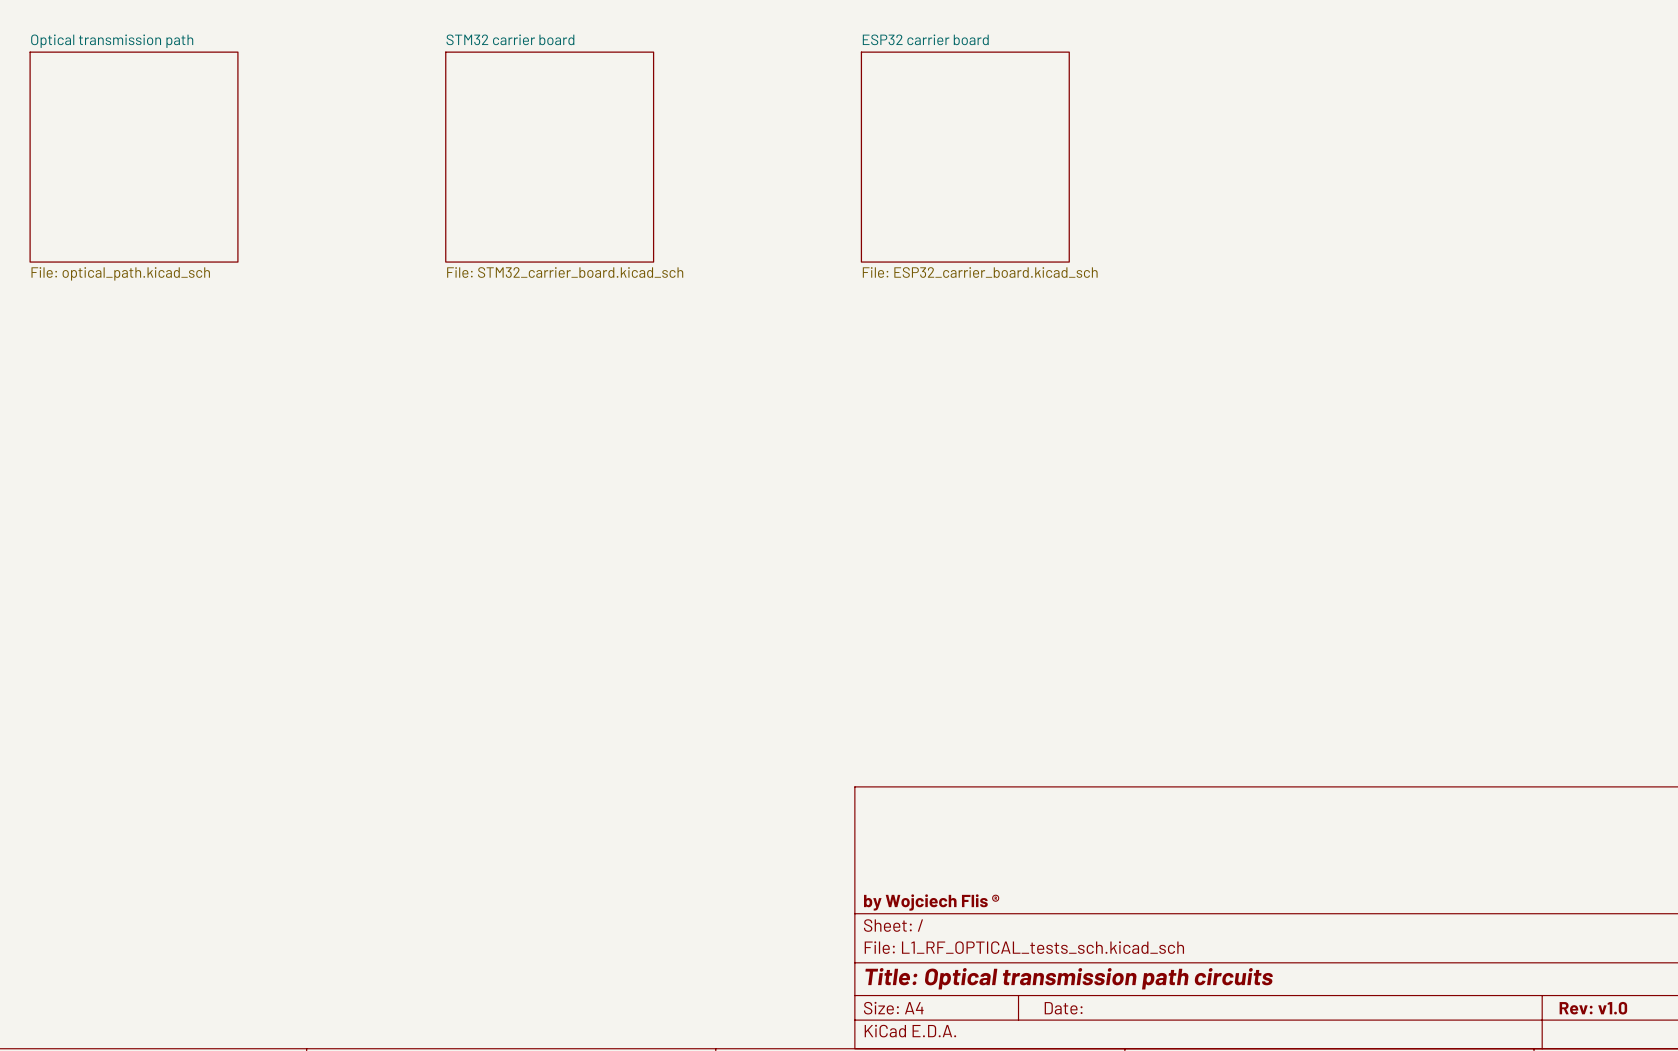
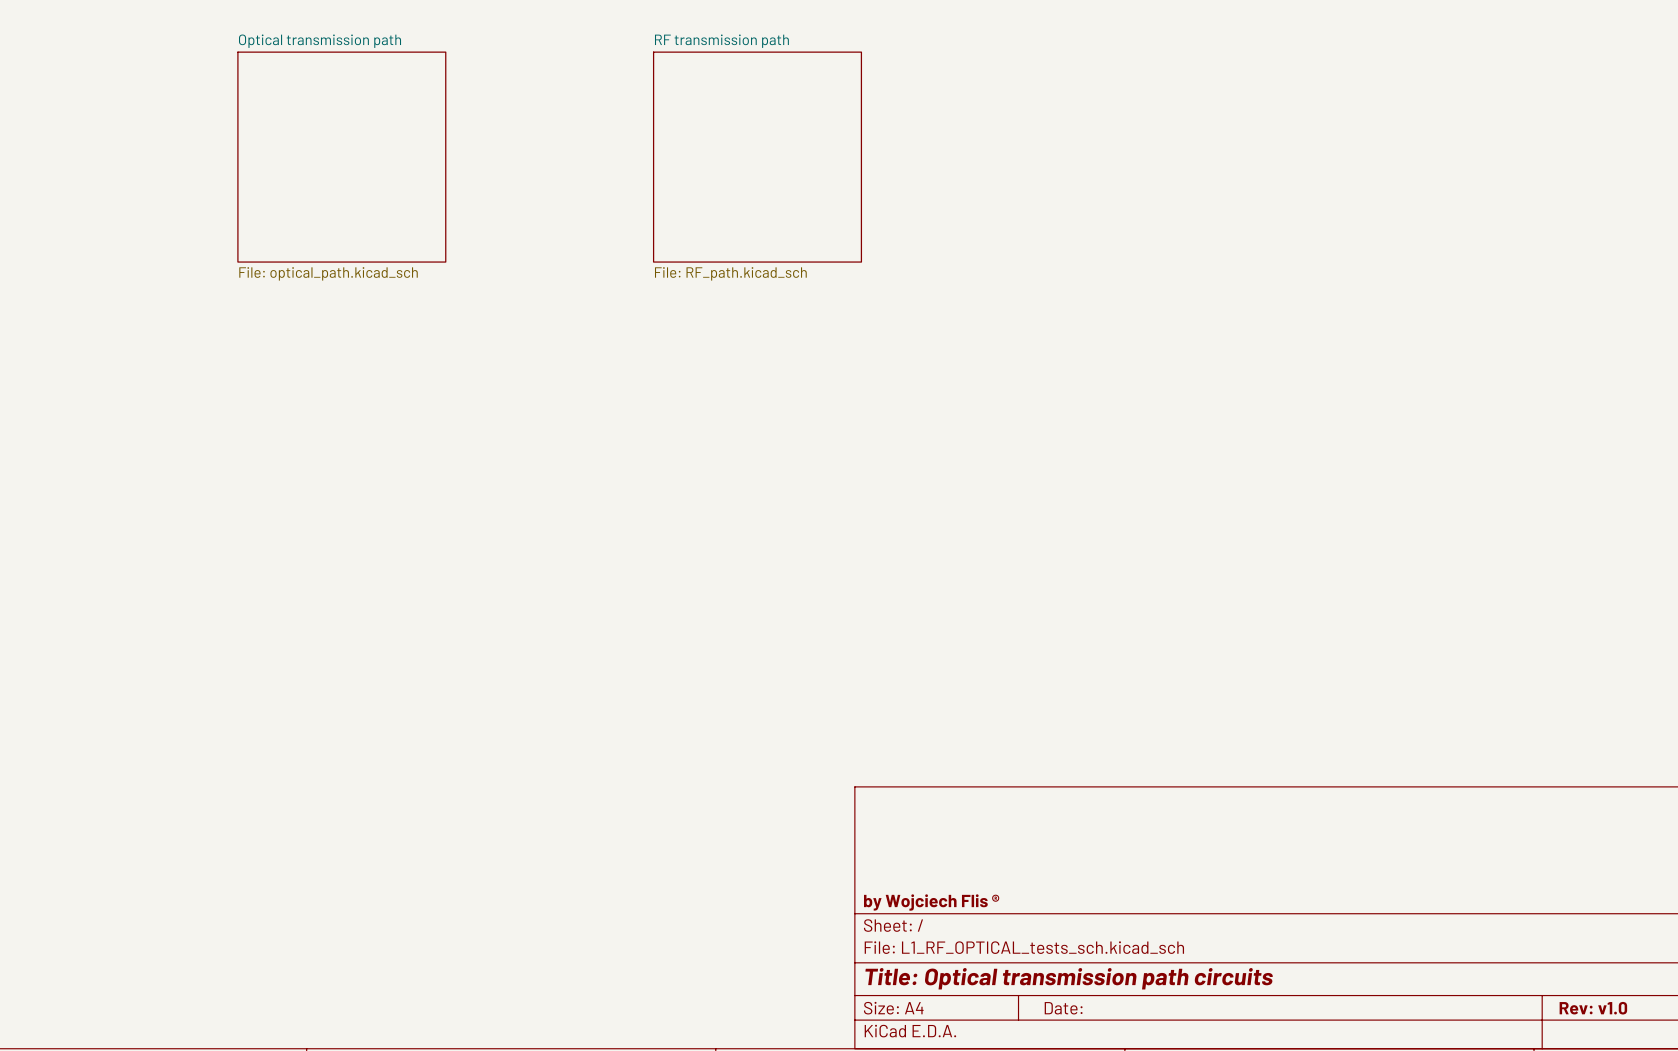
sheet Optical transmission path: File: optical_path.kicad_sch (134, 157) -> none
sheet Optical transmission path: none -> File: optical_path.kicad_sch (341, 157)
sheet STM32 carrier board: File: STM32_carrier_board.kicad_sch (549, 157) -> none
sheet RF transmission path: none -> File: RF_path.kicad_sch (757, 157)
sheet ESP32 carrier board: File: ESP32_carrier_board.kicad_sch (965, 157) -> none

